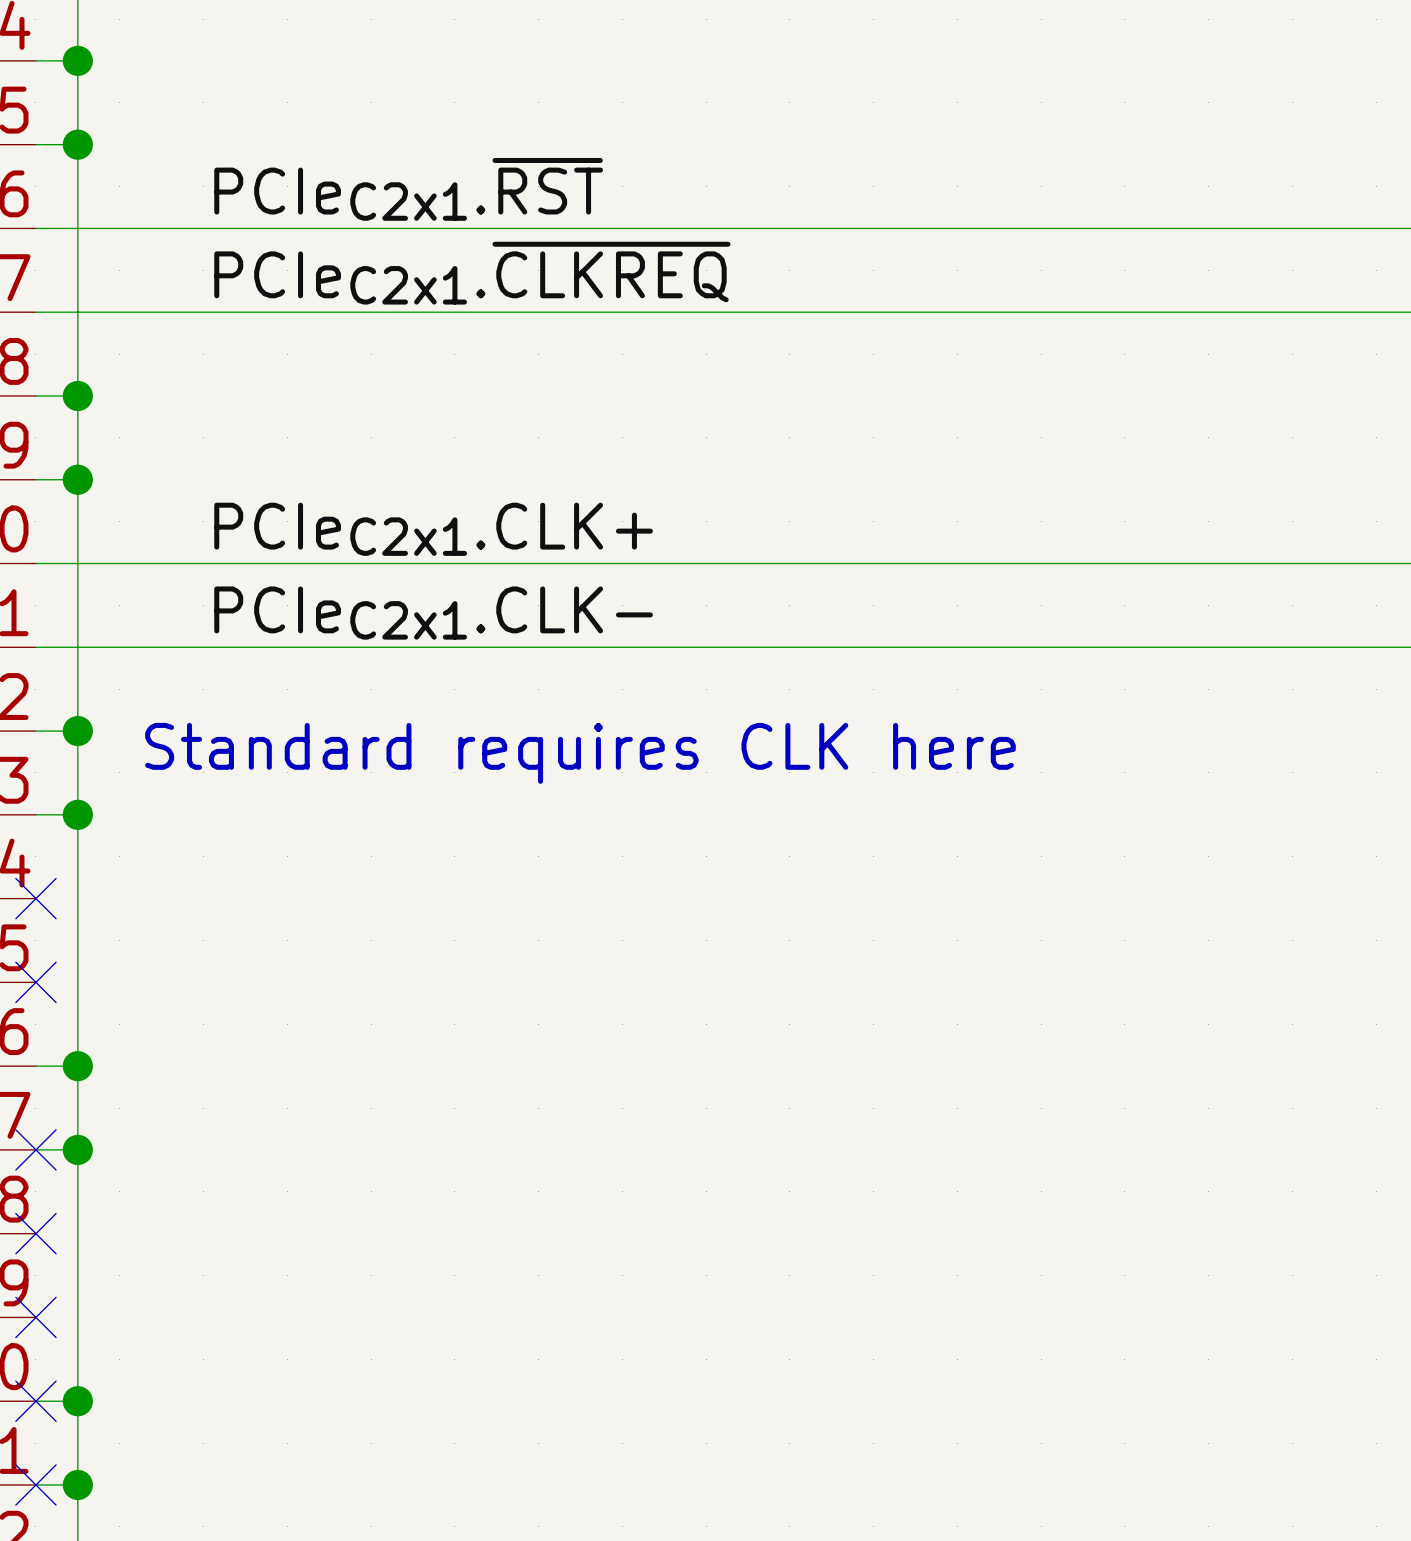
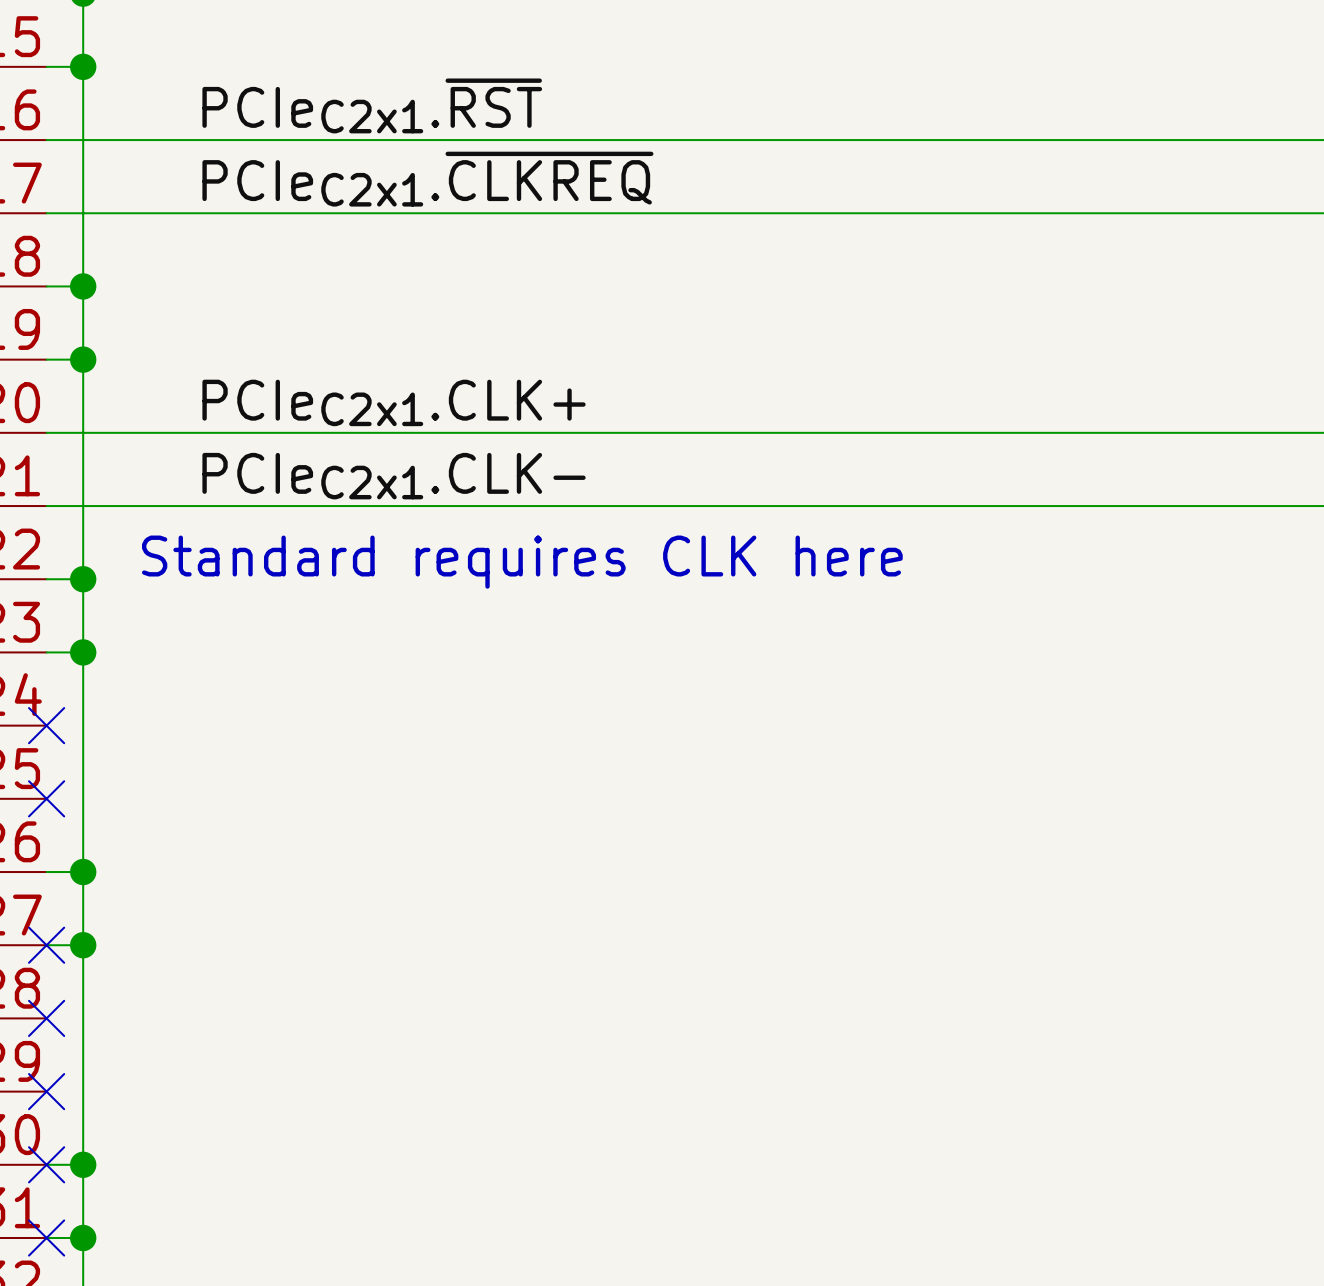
text position: Standard requires CLK here (580, 753) -> Standard requires CLK here (522, 562)

